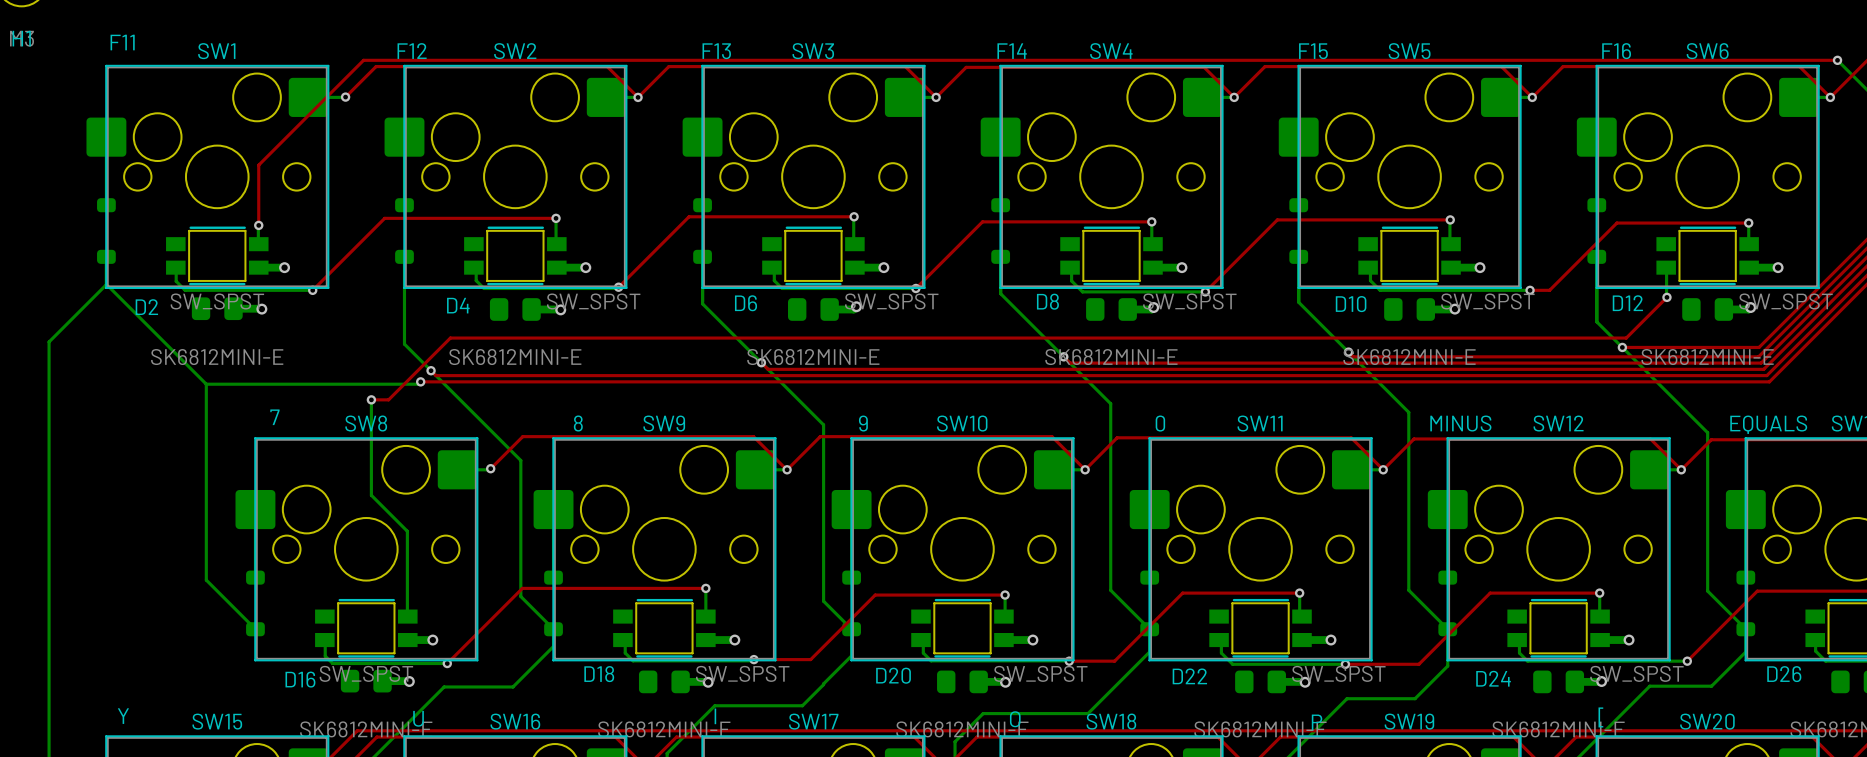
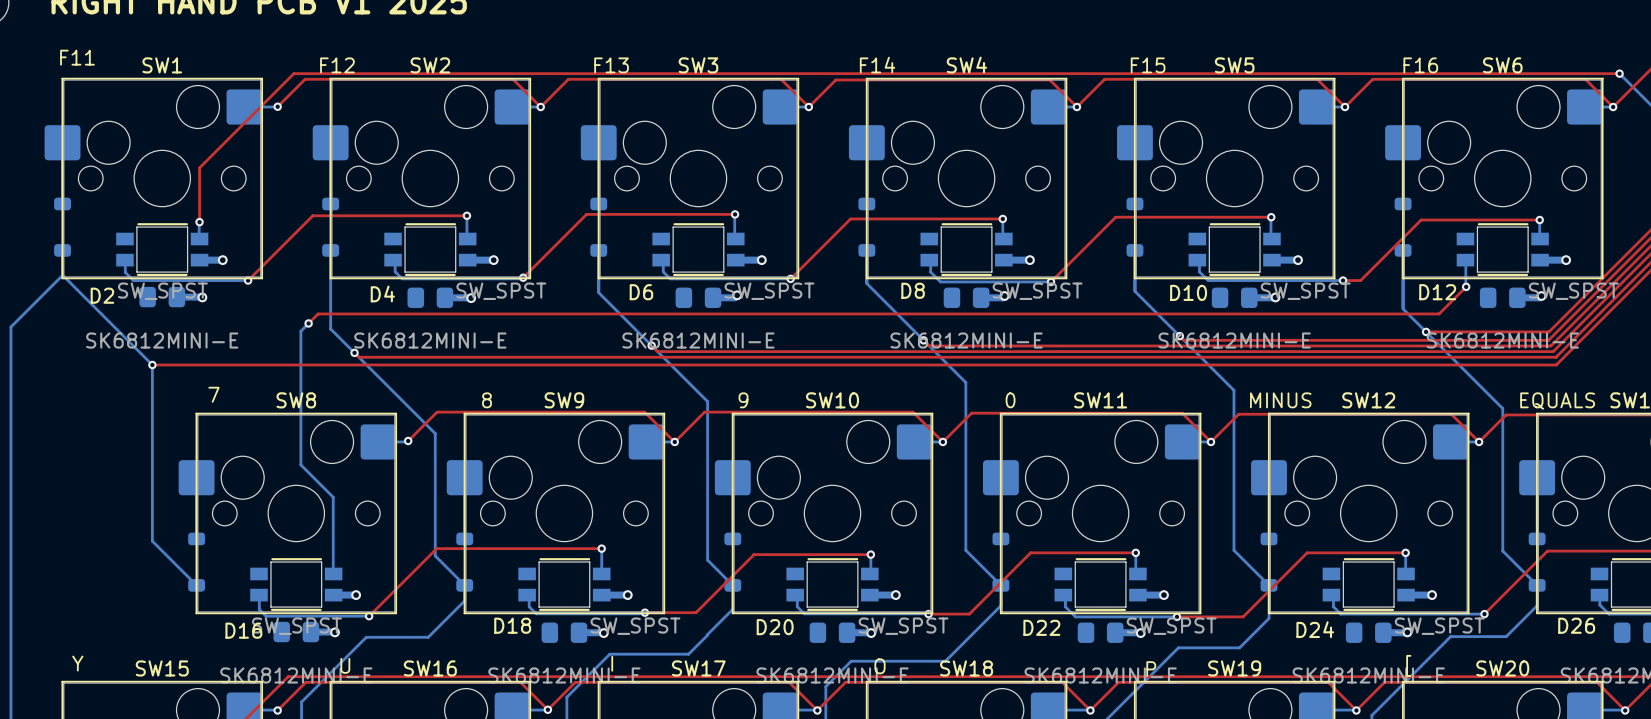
top track: (1636, 327) (1626, 338) (450, 338) (388, 399) (371, 399) -> (1439, 313) (318, 313) (308, 323)
via: none -> (308, 323)
top track: (420, 381) (1769, 381) -> (152, 364) (1556, 364) (1558, 362)
bottom track: (420, 381) (418, 384) (206, 384) -> none
via: (420, 381) -> none
via: none -> (152, 364)
bottom track: (371, 399) (371, 495) -> (308, 323) (300, 331) (300, 464)
via: (371, 399) -> none

